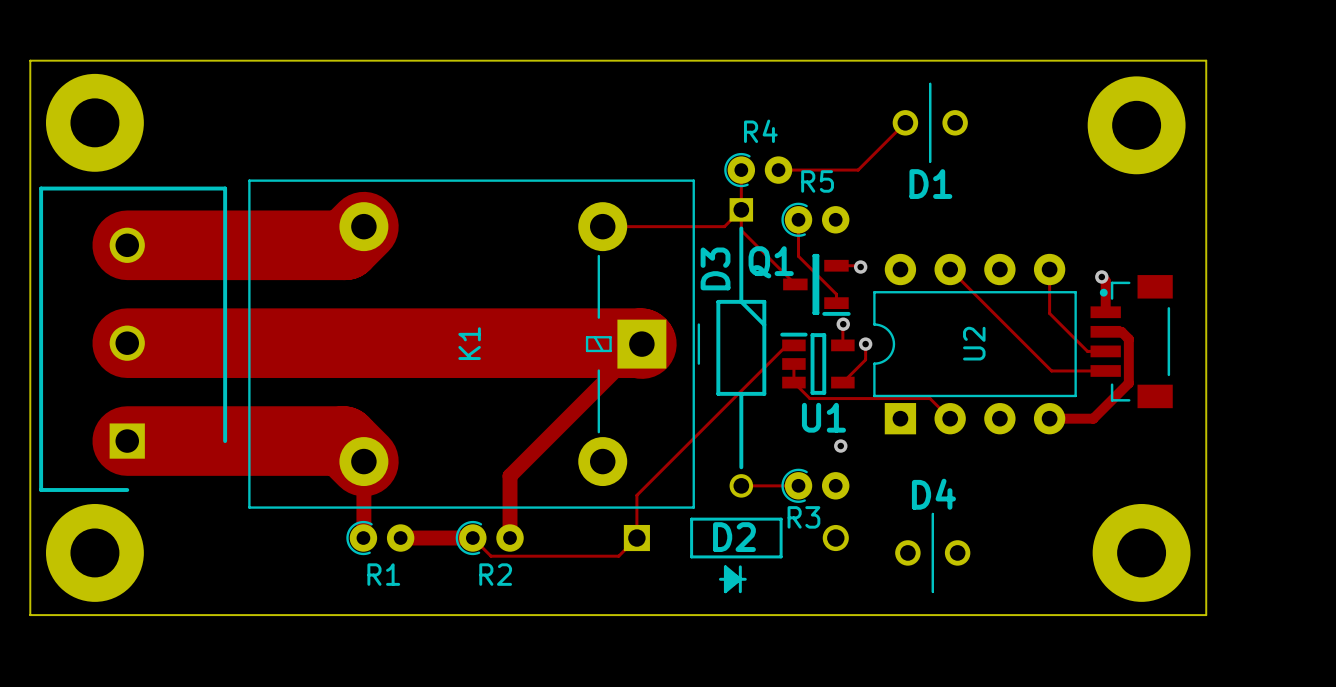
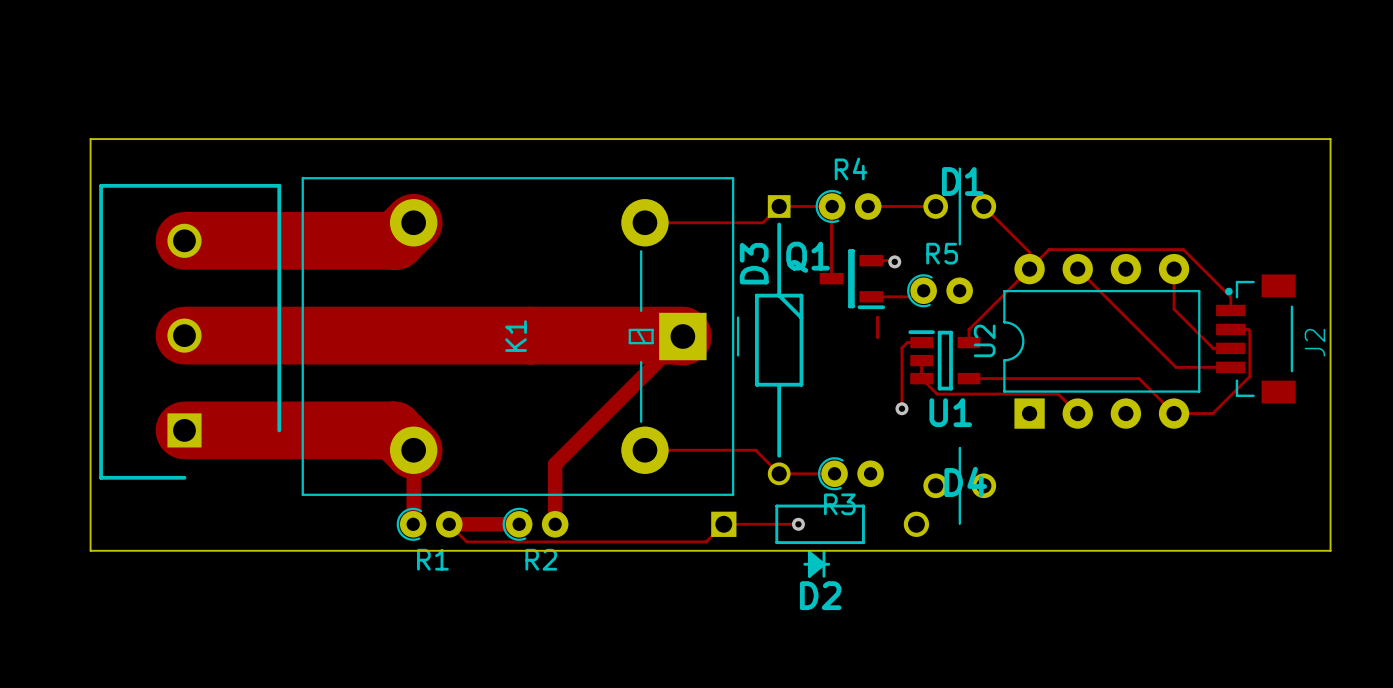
part: (94, 122) -> none
track: (905, 122) (858, 170) (778, 170) -> none
D1 position: (930, 122) -> (959, 206)
part: (1136, 125) -> none
board edge: (30, 140) (30, 60) (1206, 60) (1206, 615) (30, 615) (30, 565) -> (90, 139) (1330, 139) (1330, 550) (90, 550)
track: (741, 170) (741, 230) (795, 284) -> (779, 206) (832, 206) (831, 278)
R4 position: (758, 170) -> (848, 206)
track: none -> (868, 206) (935, 206)
track: none -> (983, 206) (1029, 252) (1029, 269)
track: (798, 219) (798, 256) (836, 294) (836, 303) -> (923, 290) (917, 296) (871, 296)
R5 position: (815, 219) -> (940, 290)
track width: thick (363, 226) (345, 245) (127, 245) -> thin (413, 222) (395, 240) (184, 240)
track: (950, 269) (1051, 370) (1105, 370) -> none
track: (1049, 269) (1049, 313) (1087, 351) (1105, 351) -> none
track: none -> (1077, 269) (1176, 367) (1230, 367)
track: none -> (1174, 269) (1174, 309) (1213, 348) (1230, 348)
track: (1101, 276) (1105, 280) (1105, 312) -> none
via: (1101, 276) -> none
track: none -> (1230, 310) (1230, 296) (1183, 249) (1049, 249) (969, 329) (969, 342)
via: (843, 324) -> none
track: (1105, 331) (1121, 331) (1128, 339) (1128, 383) (1093, 418) (1049, 418) -> none
track: none -> (1230, 329) (1249, 330) (1249, 376) (1212, 413) (1174, 413) (1139, 378) (969, 378)
part: (1131, 341) -> none
track width: thick (127, 343) (641, 344) -> thin (184, 335) (682, 336)
U2 name position: U2 (974, 343) -> U2 (984, 340)
track: (865, 344) (865, 359) (842, 382) -> none
via: (865, 344) -> none
U2 position: (975, 344) -> (1101, 341)
track: (793, 345) (786, 345) (636, 495) (636, 538) (618, 556) -> (798, 524) (723, 524) (706, 541) (660, 541)
J2: none -> (1255, 338)
track: none -> (921, 342) (907, 342) (901, 347) (901, 408)
track: (793, 363) (793, 382) (809, 398) (930, 398) (950, 418) -> none
U1 position: (817, 363) -> (944, 360)
track: none -> (921, 360) (921, 378) (937, 394) (1058, 394) (1077, 413)
via: none -> (901, 408)
track width: thick (127, 441) (343, 441) (363, 461) -> thin (184, 430) (393, 430) (413, 450)
via: (840, 446) -> none
track: none -> (644, 450) (755, 450) (779, 473)
D2 name position: D2 (734, 537) -> D2 (820, 595)
track: (472, 538) (491, 556) -> (449, 524) (466, 541) (536, 541)
via: none -> (798, 524)
part: (94, 552) -> none
D4 position: (932, 552) -> (959, 485)
part: (1141, 552) -> none
D2 position: (736, 555) -> (820, 541)

